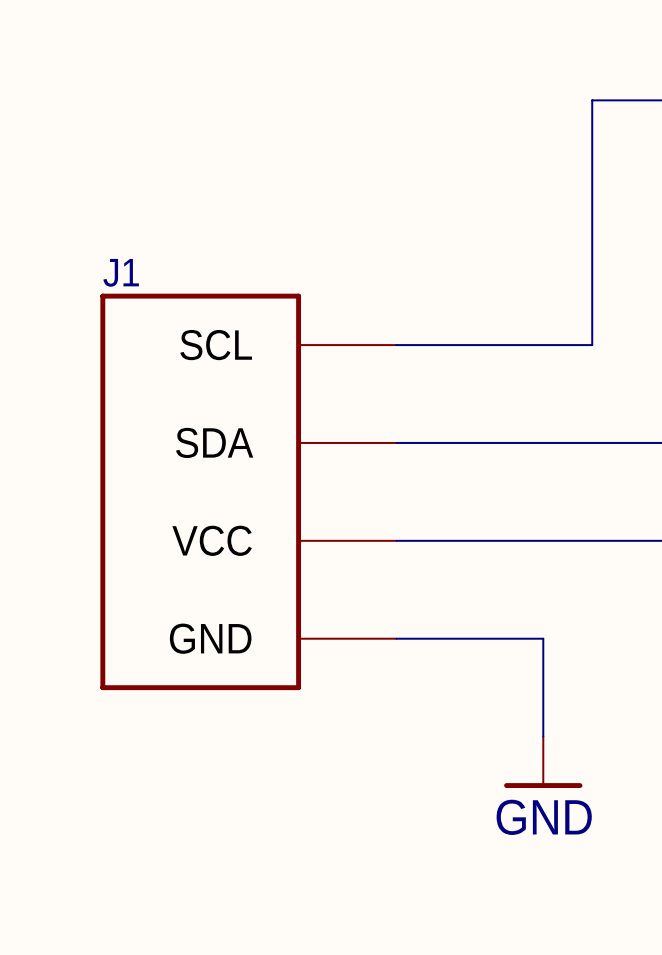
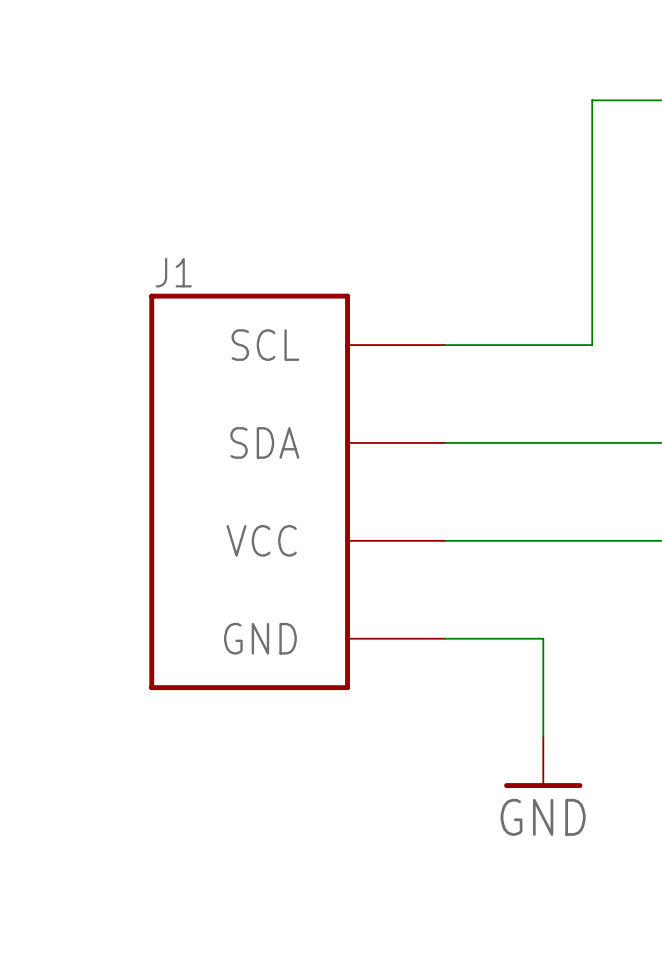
J1 position: (248, 491) -> (297, 491)

